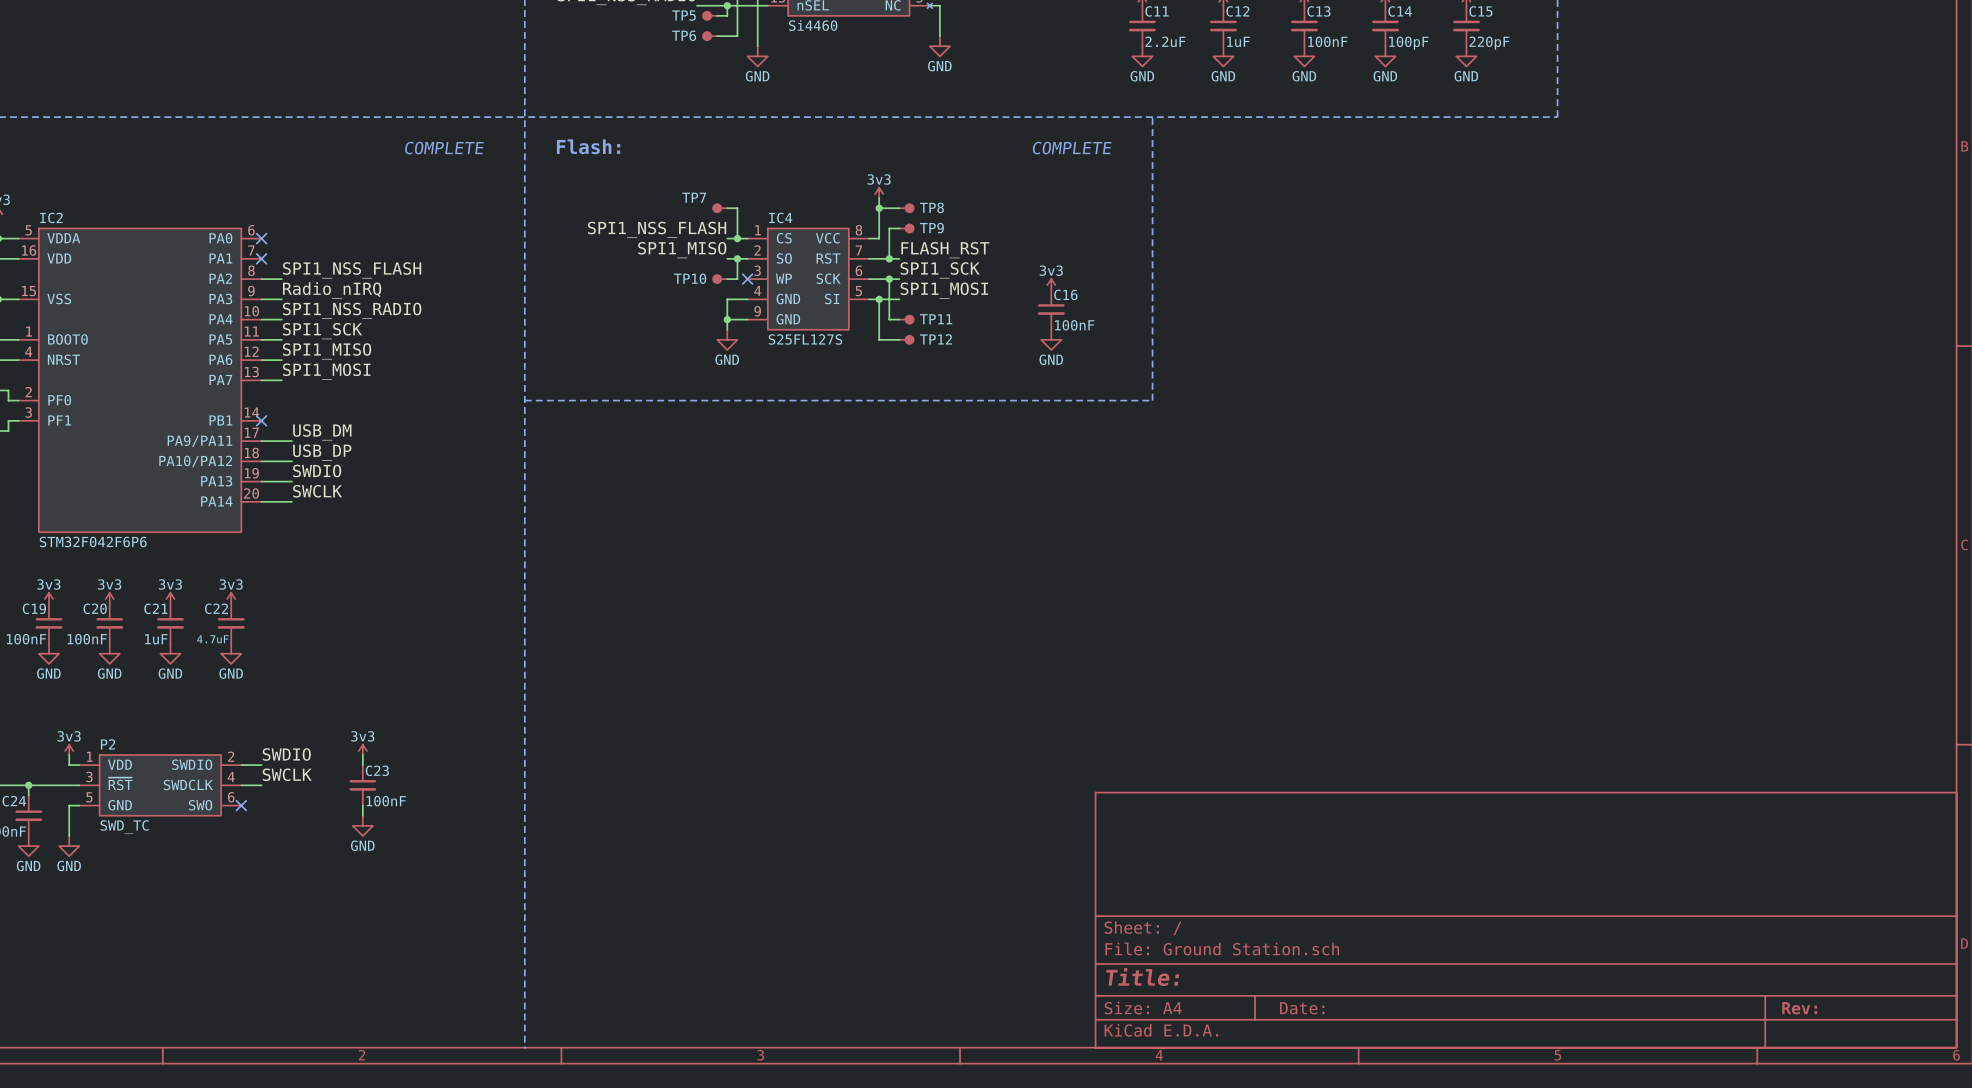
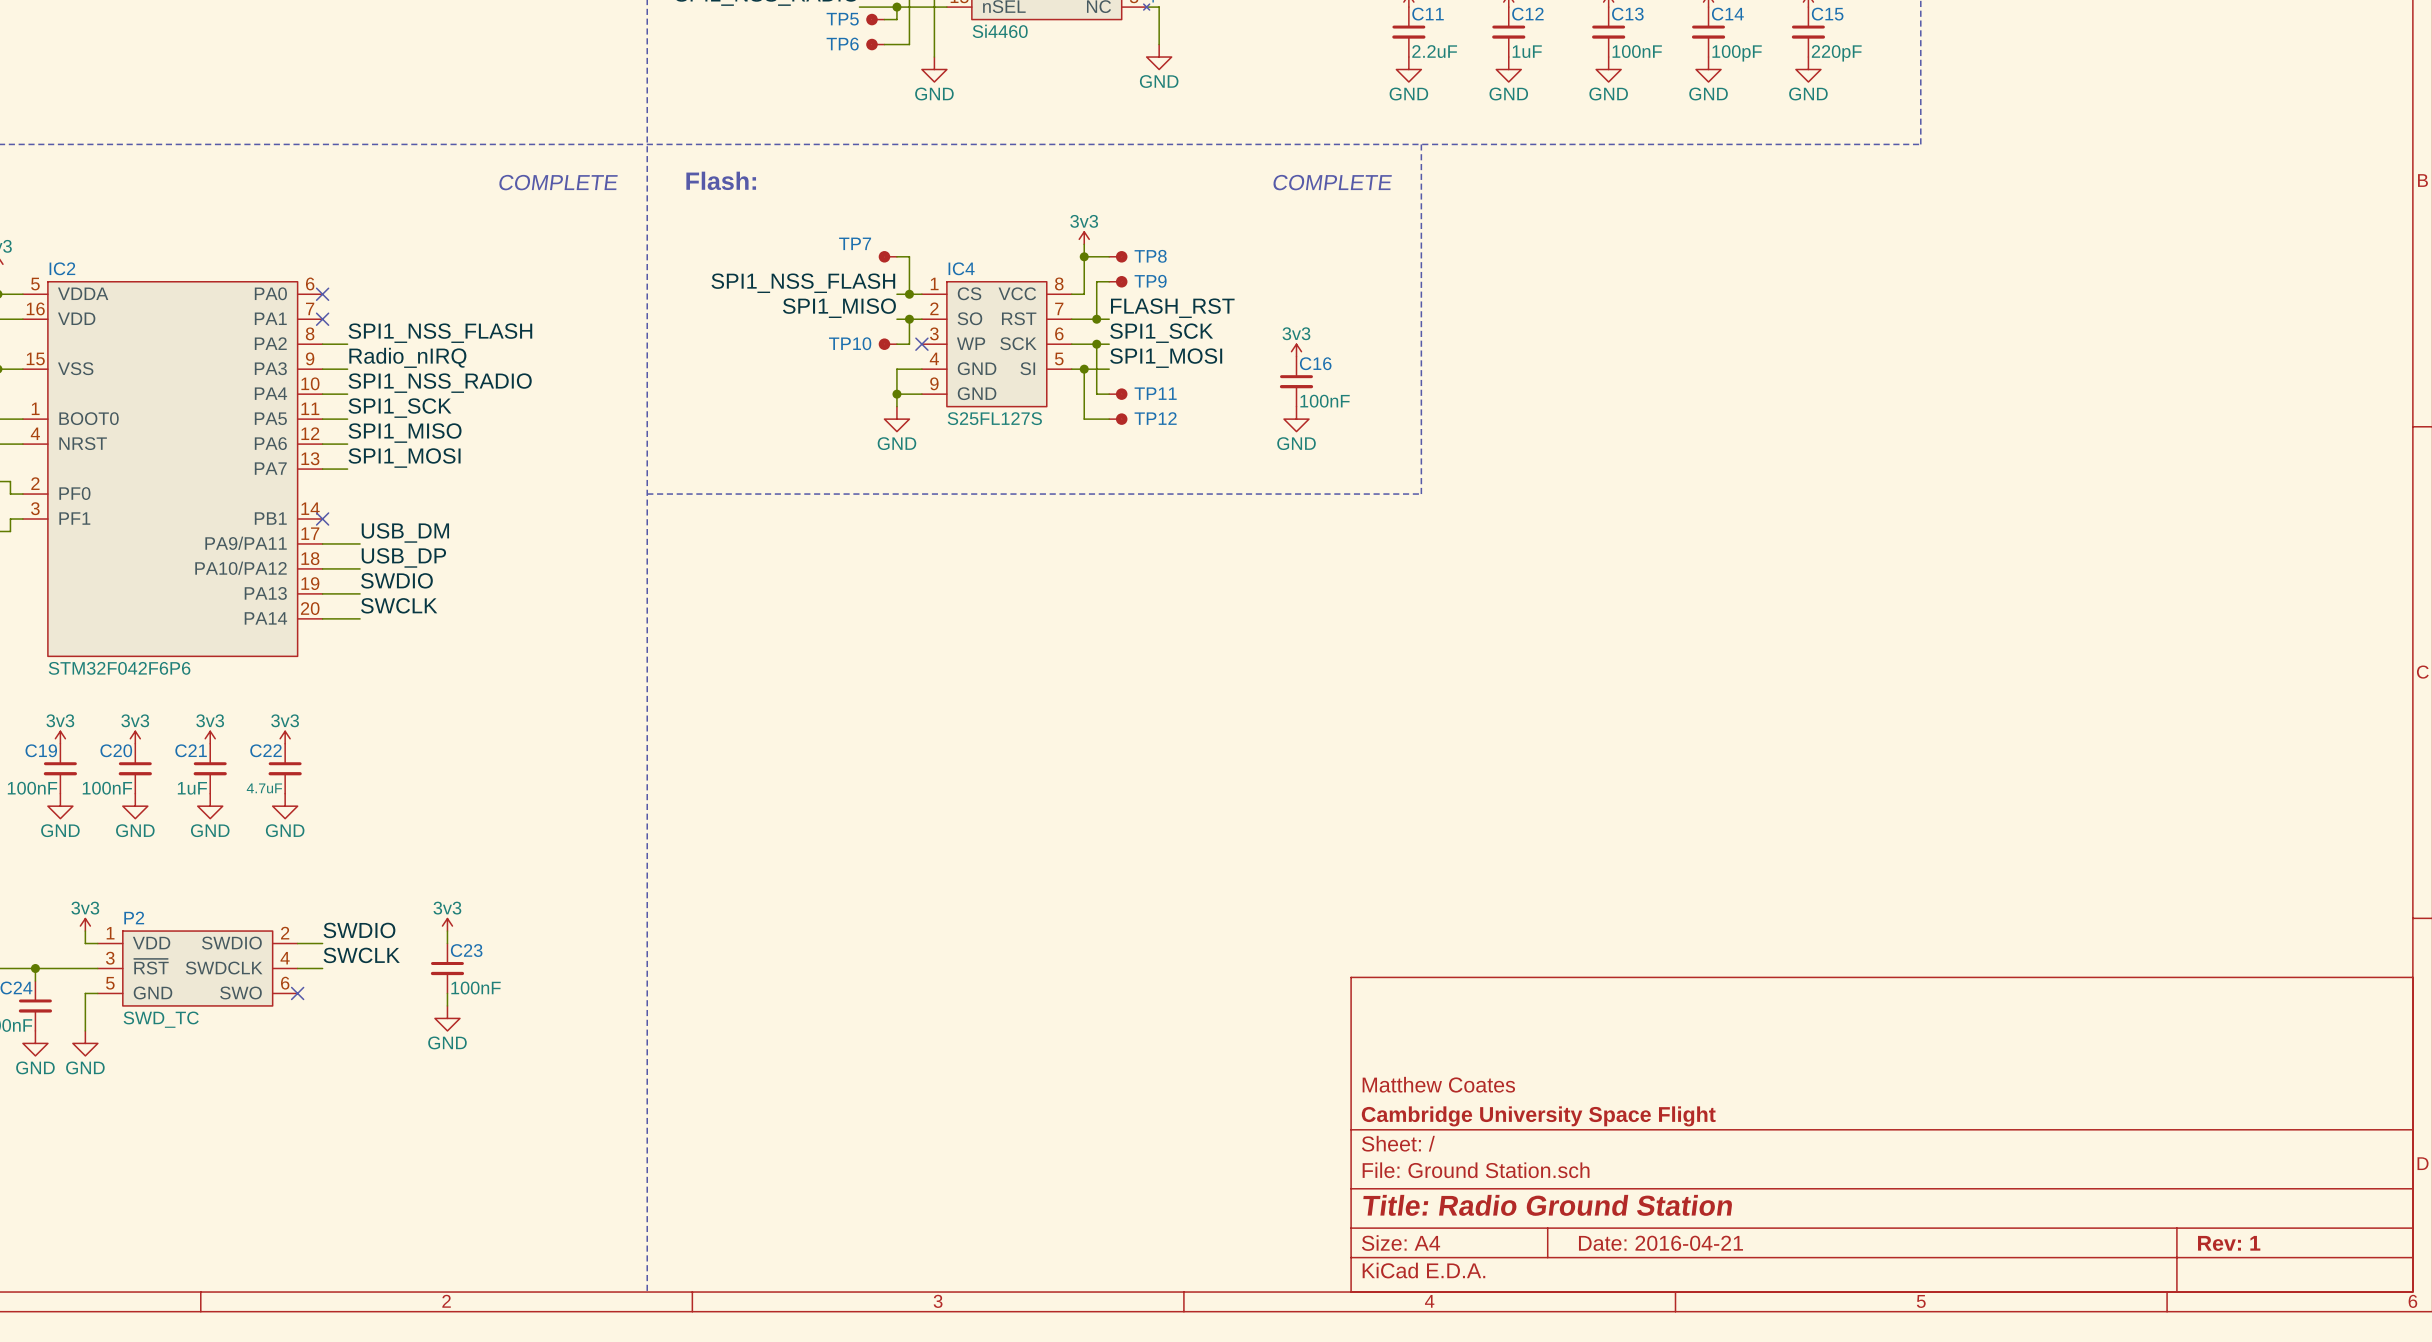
title block: none -> Matthew Coates (1438, 1084)
title block: none -> Cambridge University Space Flight (1538, 1116)
title block: Title: (1142, 976) -> Title: Radio Ground Station (1547, 1205)
title block: Date: (1302, 1008) -> Date: 2016-04-21 (1660, 1243)
title block: Rev: (1799, 1008) -> Rev: 1 (2229, 1243)

